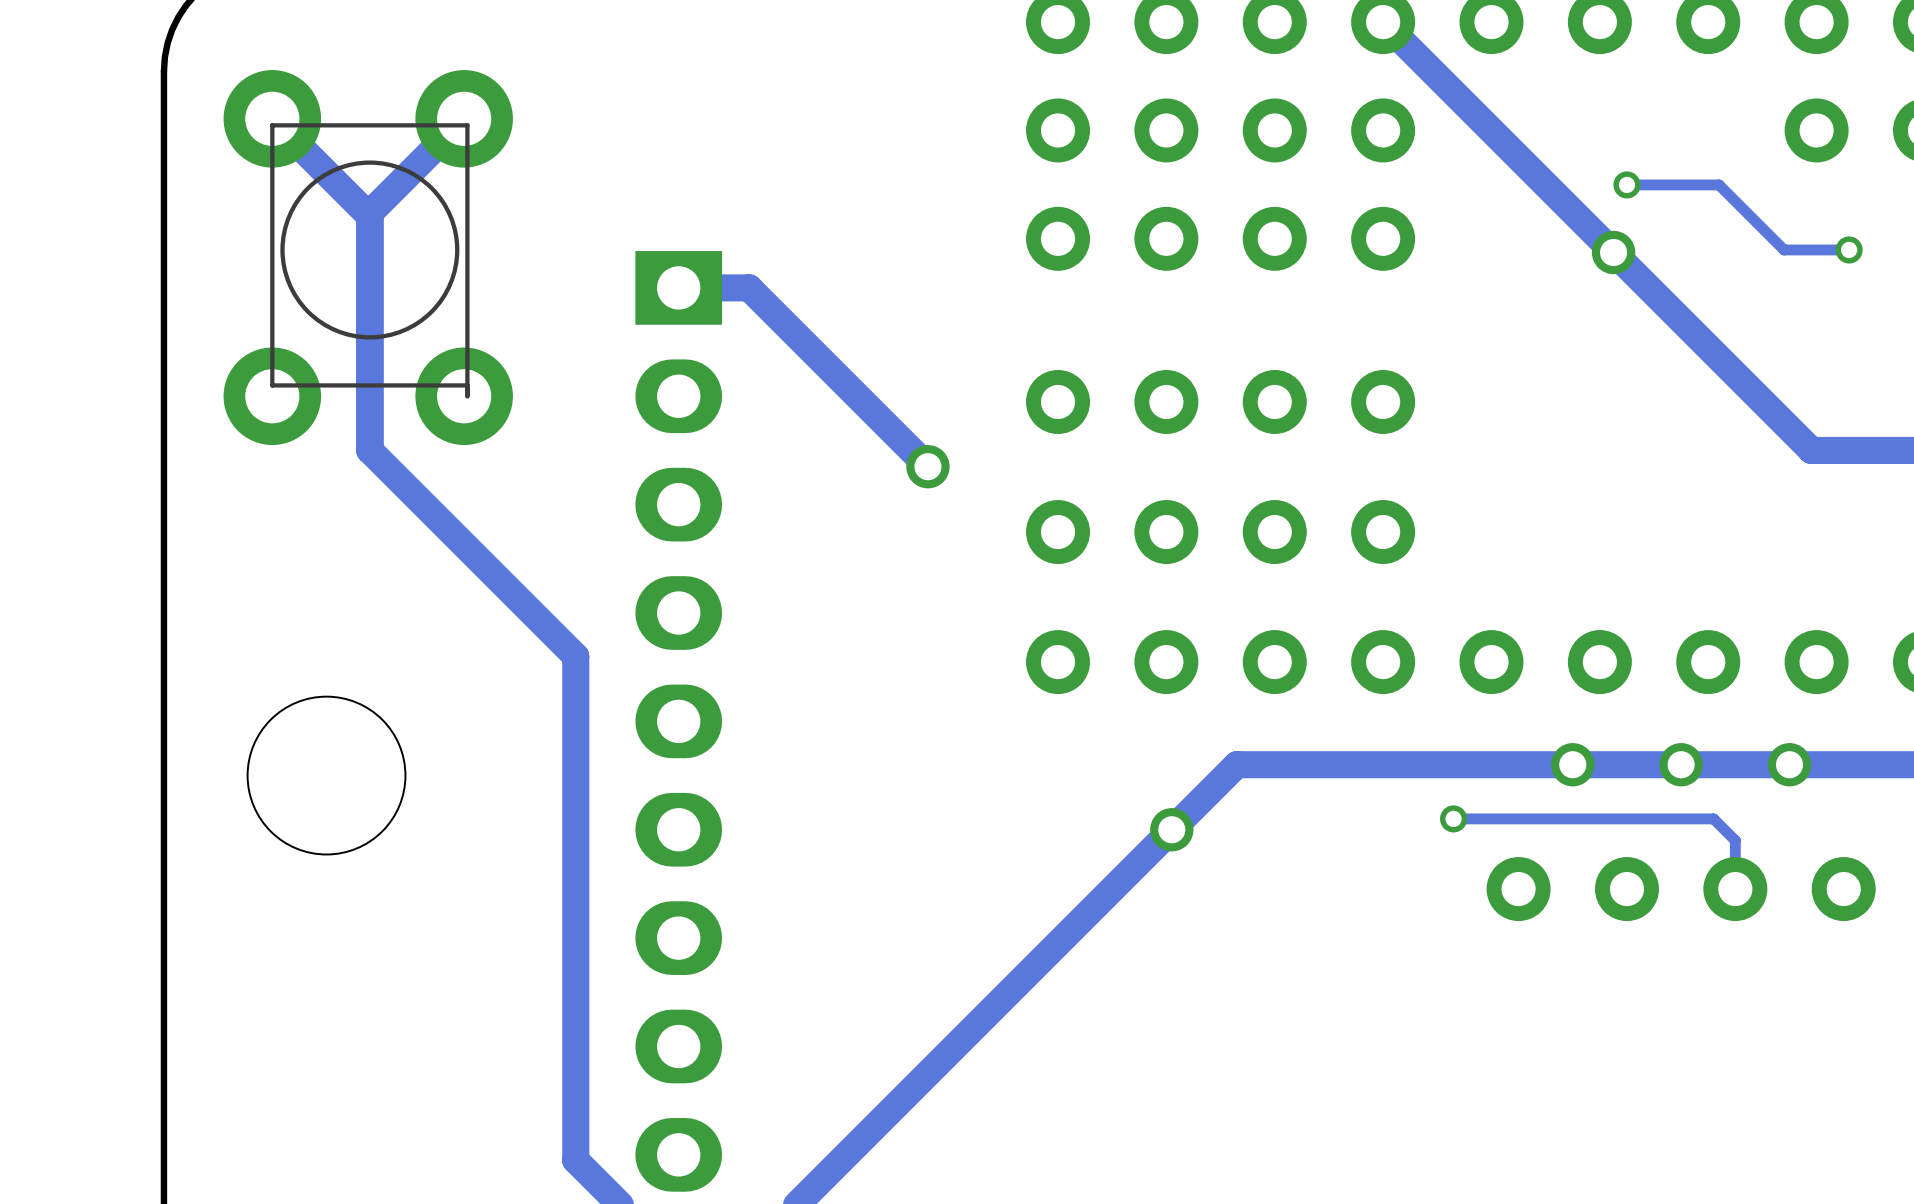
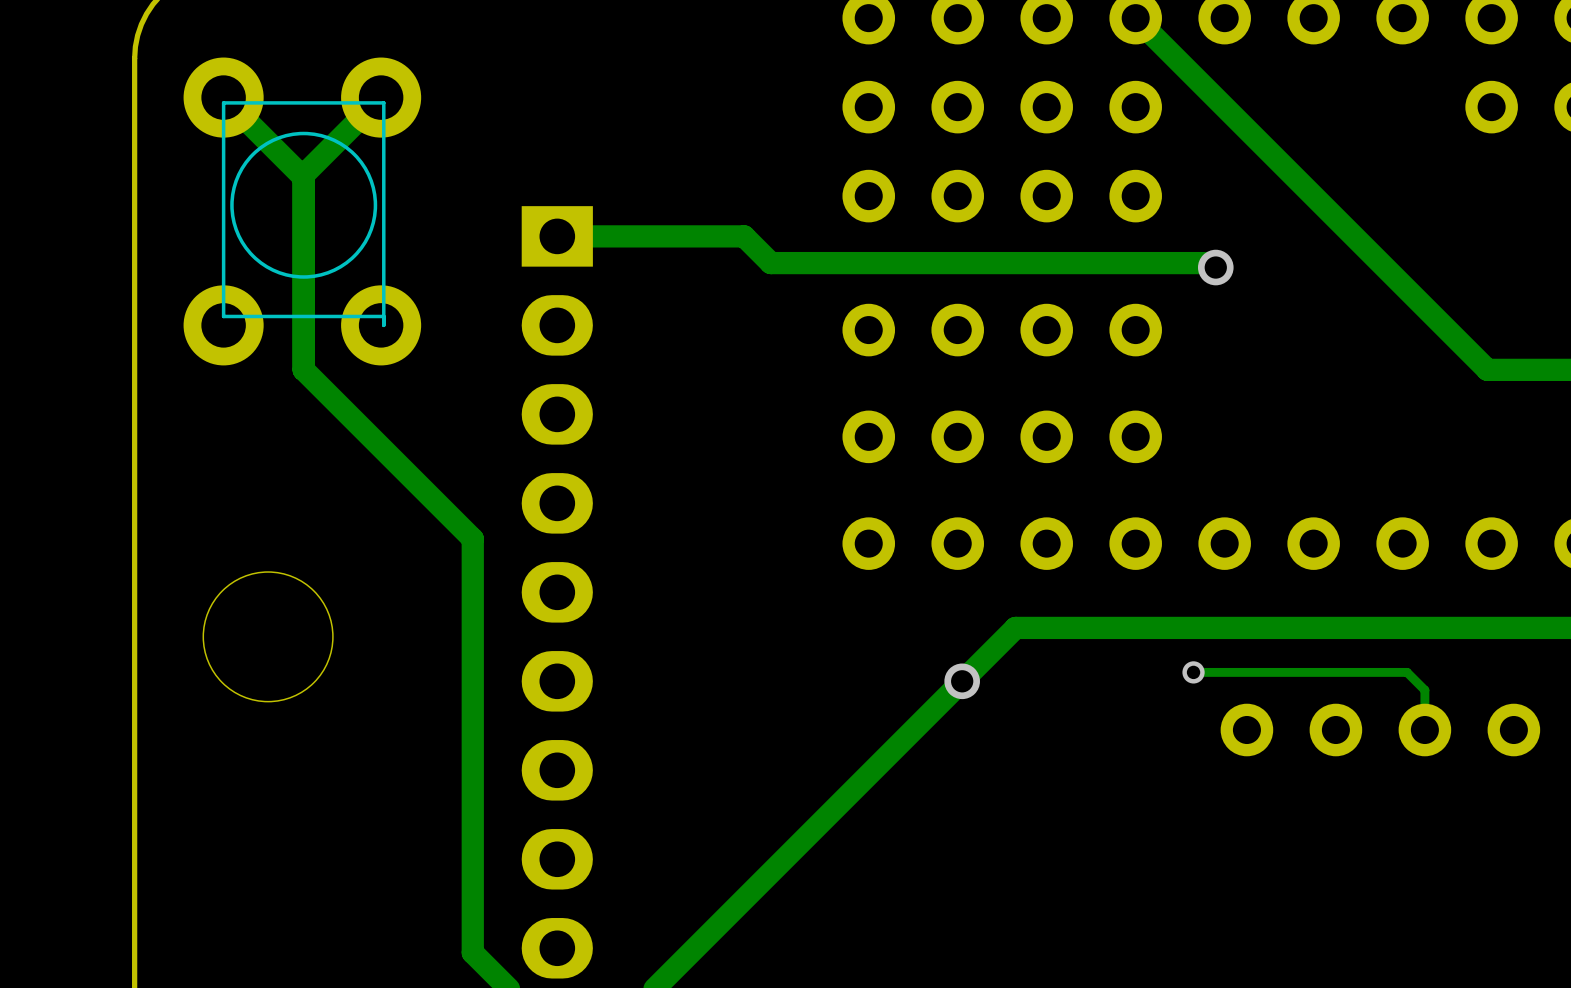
track: (1626, 184) (1719, 184) (1784, 249) (1849, 249) -> none
via: (1626, 184) -> none
via: (1849, 249) -> none
via position: (1613, 252) -> (1215, 267)
track: (749, 287) (927, 466) -> (615, 236) (744, 236) (770, 263) (1211, 263) (1215, 267)
via: (927, 466) -> none
via: (1572, 764) -> none
via: (1681, 764) -> none
via: (1789, 764) -> none

